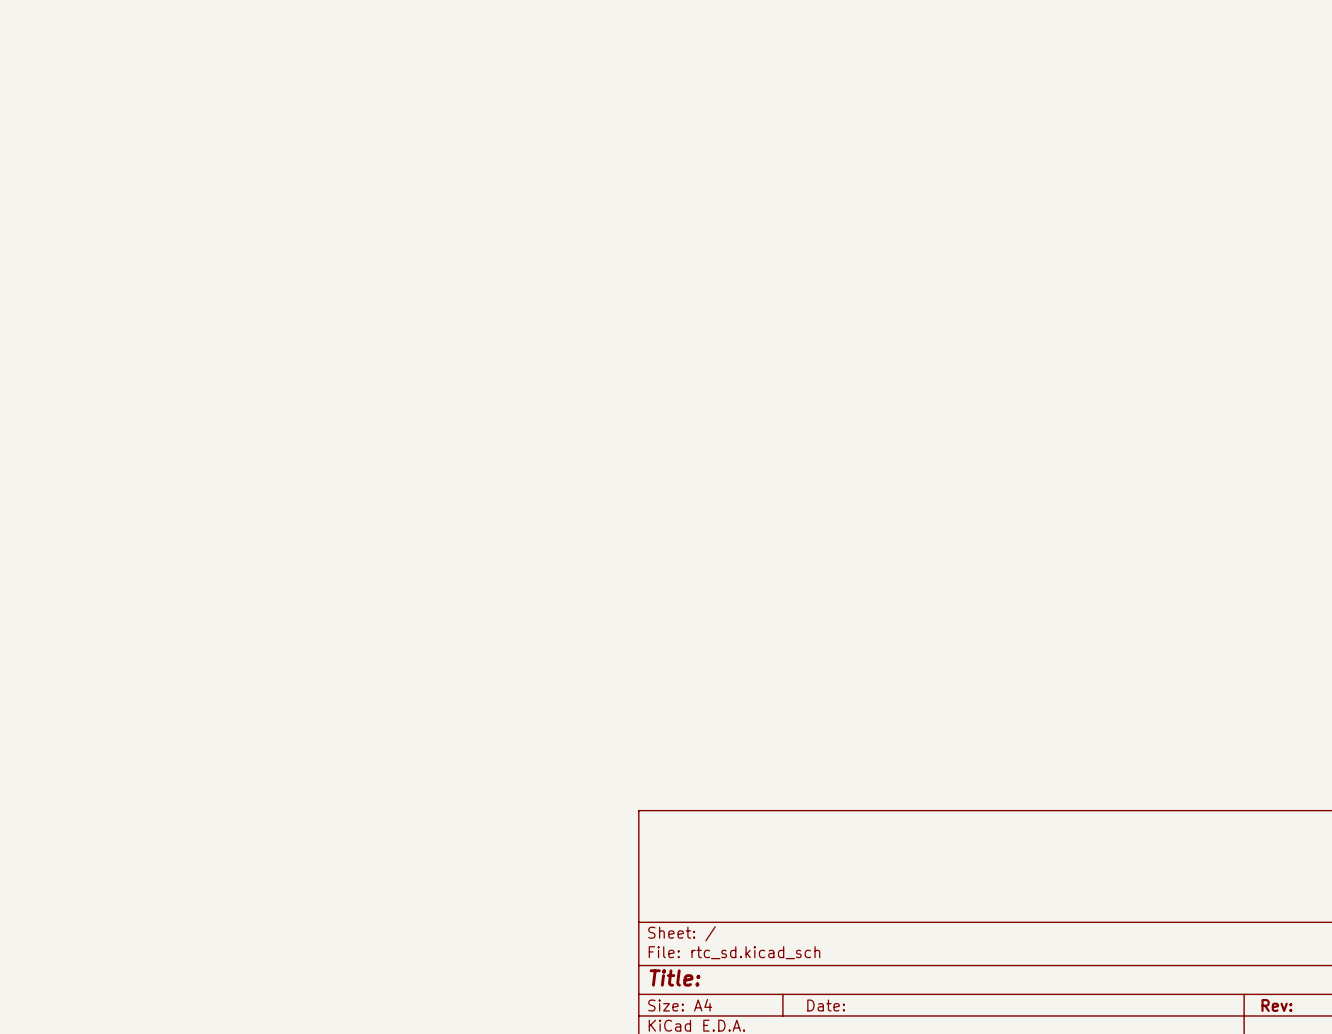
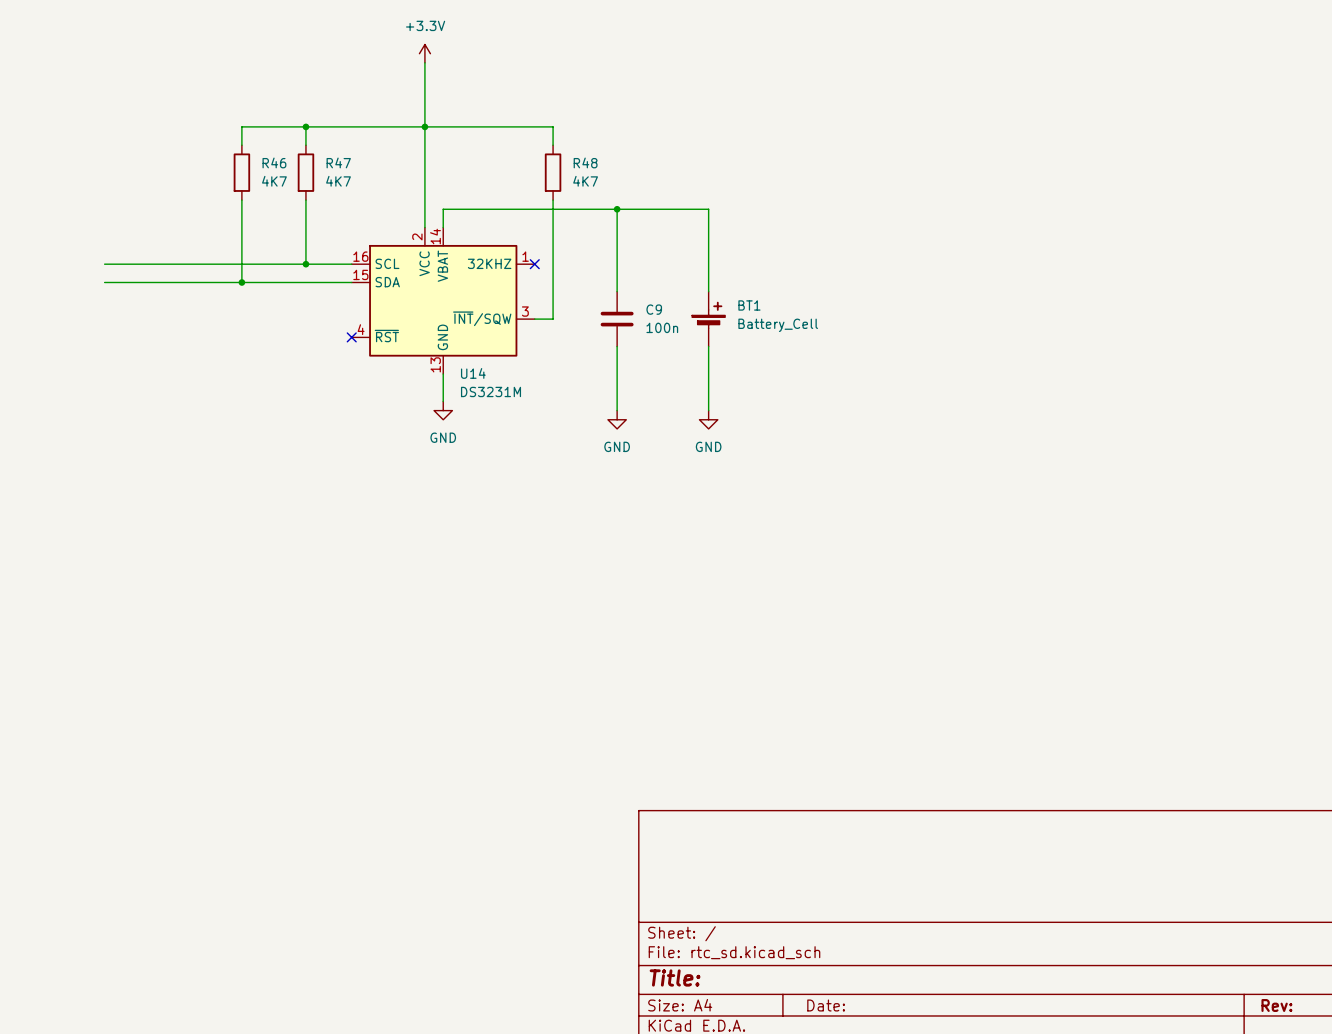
power symbol: none -> +3.3V (424, 53)
wire: none -> (424, 62) (424, 227)
wire: none -> (305, 126) (305, 145)
junction: none -> (305, 126)
junction: none -> (424, 126)
wire: none -> (241, 145) (241, 126) (553, 126) (553, 145)
R46: none -> 4K7 (241, 172)
R47: none -> 4K7 (305, 172)
R48: none -> 4K7 (553, 172)
wire: none -> (241, 200) (241, 282)
wire: none -> (305, 200) (305, 264)
wire: none -> (553, 200) (553, 319) (534, 319)
wire: none -> (617, 209) (617, 291)
junction: none -> (617, 209)
wire: none -> (443, 227) (443, 209) (708, 209) (708, 291)
wire: none -> (104, 264) (351, 264)
junction: none -> (305, 264)
no-connect mark: none -> (534, 264)
wire: none -> (104, 282) (351, 282)
junction: none -> (241, 282)
U14: none -> DS3231M (443, 300)
C9: none -> 100n (617, 319)
BT1: none -> Battery_Cell (708, 319)
no-connect mark: none -> (351, 337)
wire: none -> (617, 346) (617, 410)
wire: none -> (708, 346) (708, 410)
wire: none -> (443, 374) (443, 401)
power symbol: none -> GND (443, 410)
power symbol: none -> GND (617, 419)
power symbol: none -> GND (708, 419)

